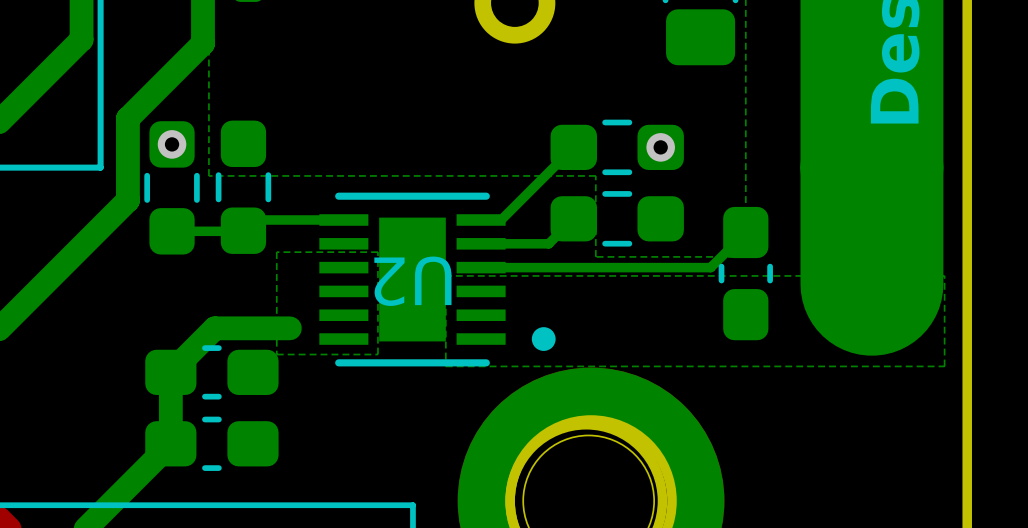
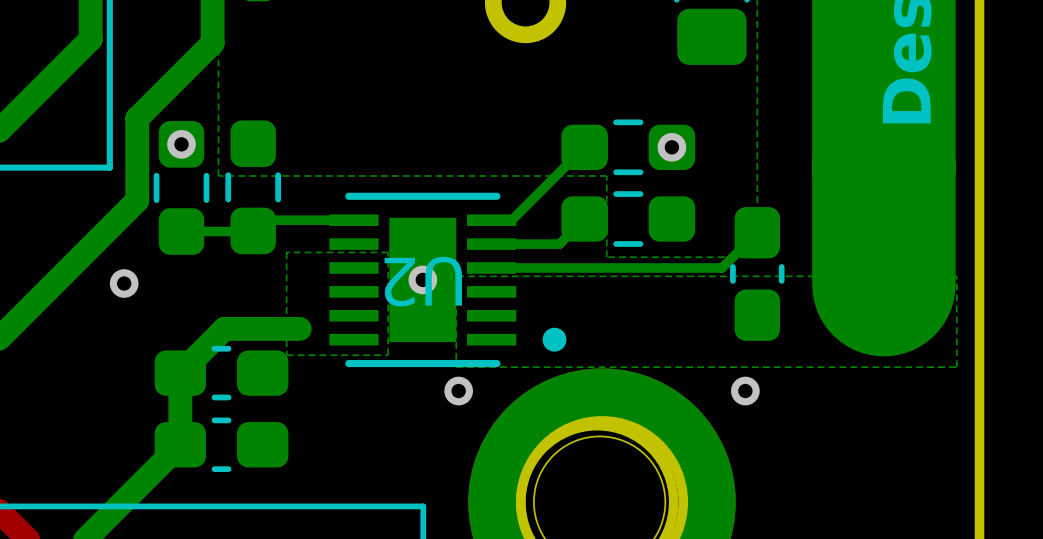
via: none -> (422, 279)
via: none -> (124, 283)
via: none -> (458, 391)
via: none -> (745, 391)

